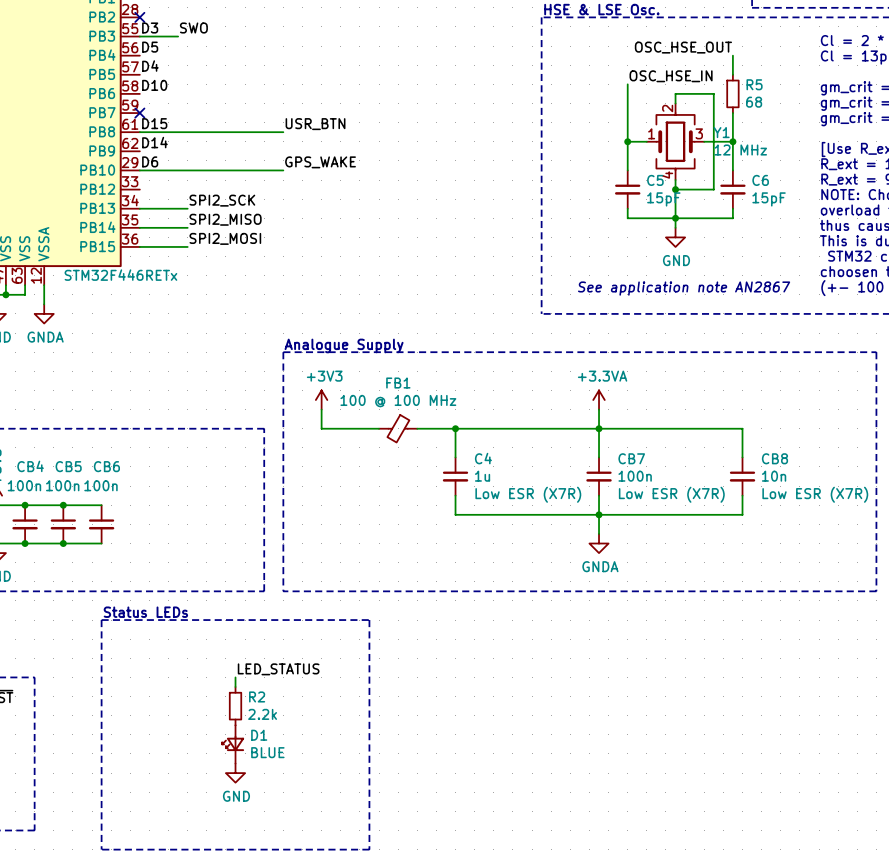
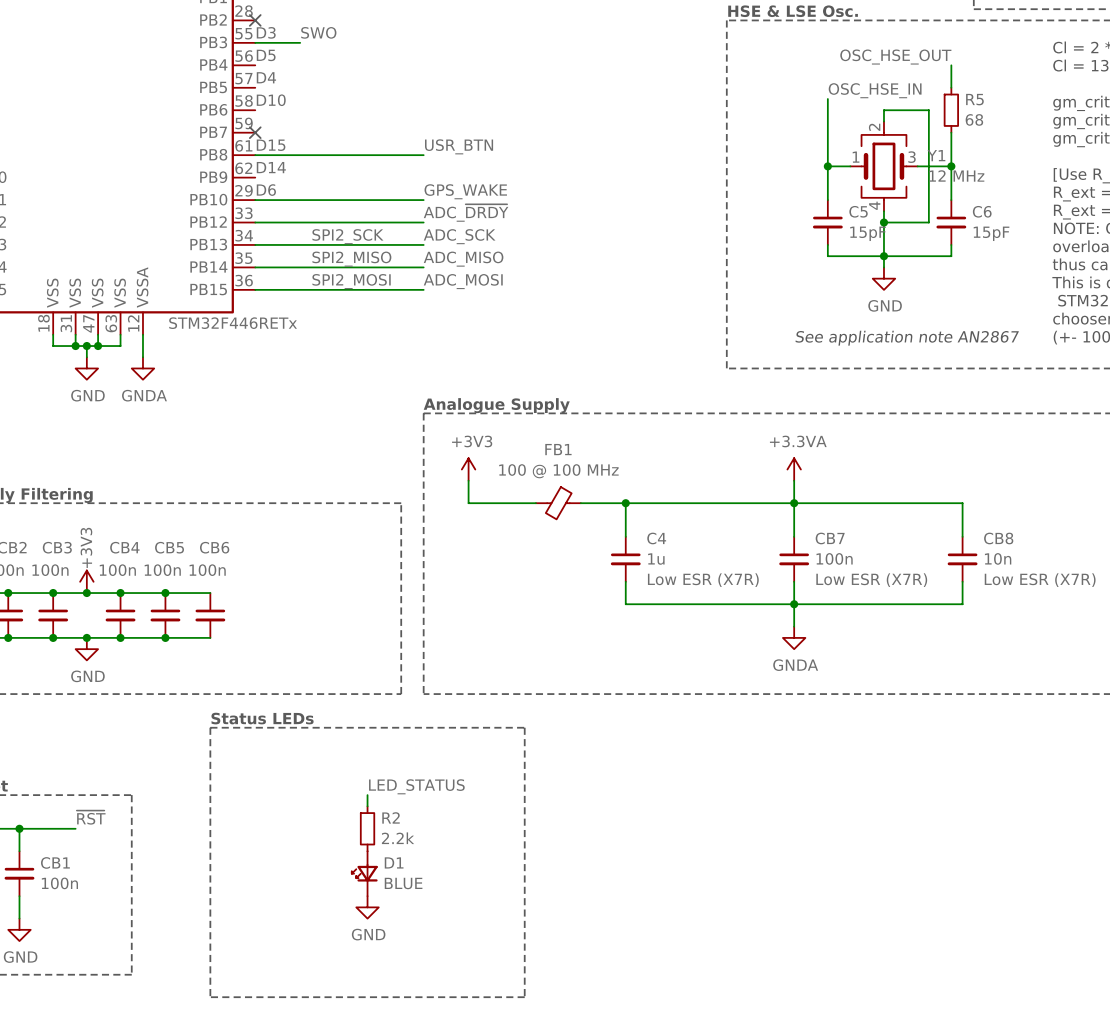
label: none -> ADC_~{DRDY} (466, 213)
wire: none -> (255, 222) (423, 222)
label: none -> ADC_SCK (459, 236)
wire: none -> (311, 244) (423, 244)
label: none -> ADC_MISO (463, 259)
wire: none -> (311, 267) (423, 267)
label: none -> ADC_MOSI (463, 281)
wire: none -> (311, 289) (423, 289)

